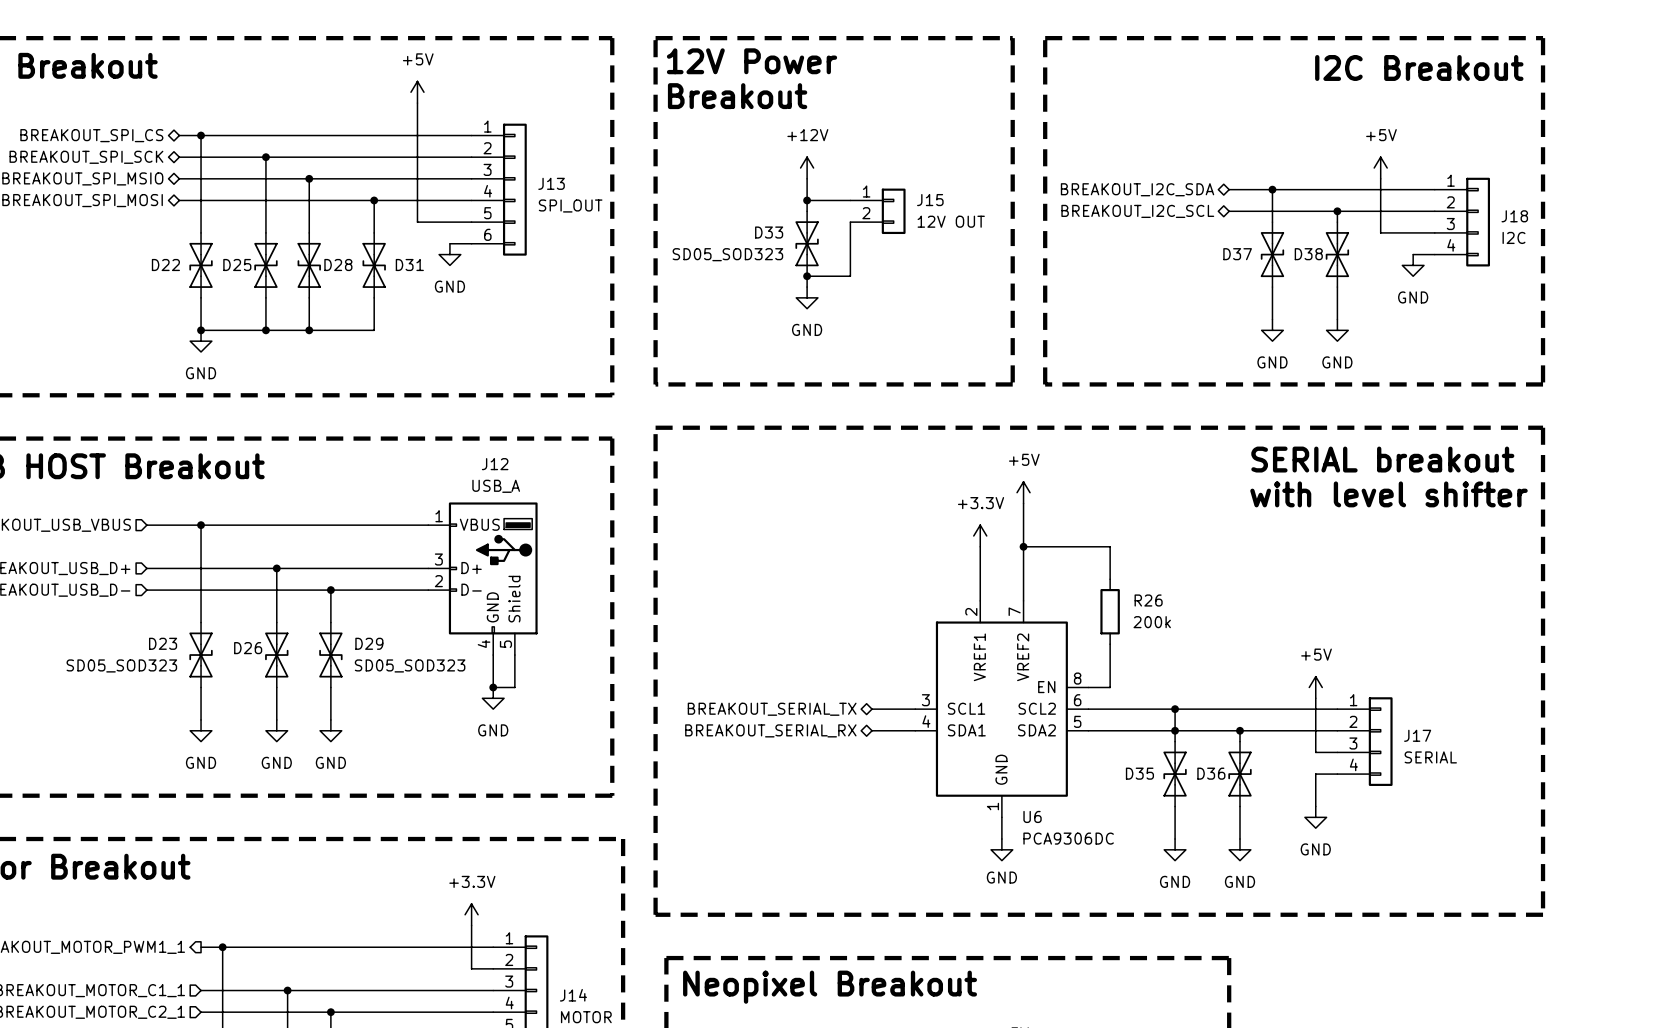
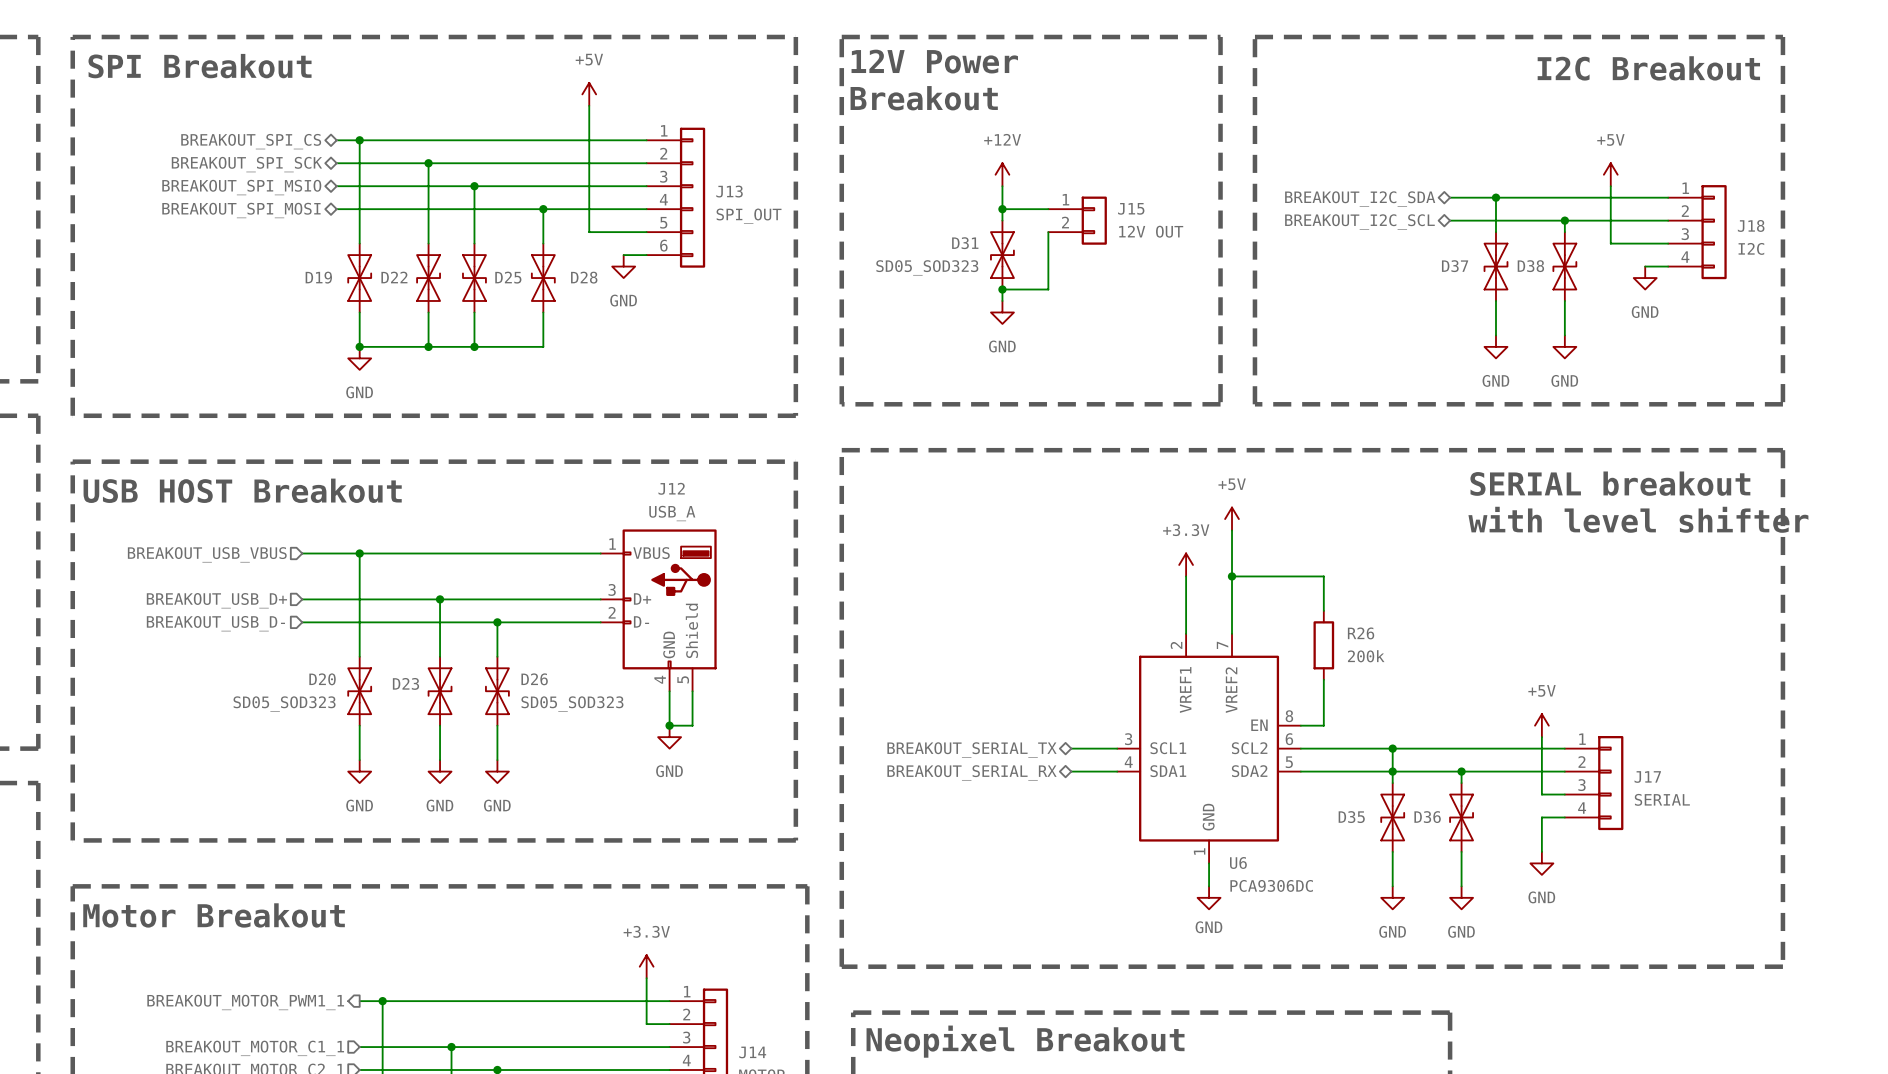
D33 name: D33 (769, 232) -> D31 (965, 243)
D22 name: D22 (165, 265) -> D19 (318, 277)
D25 name: D25 (237, 265) -> D22 (394, 277)
D28 name: D28 (338, 265) -> D25 (508, 277)
D31 name: D31 (409, 265) -> D28 (584, 277)
D23 name: D23 (163, 643) -> D20 (322, 679)
D29 name: D29 (369, 643) -> D26 (534, 679)
D26 name: D26 (248, 648) -> D23 (405, 683)

